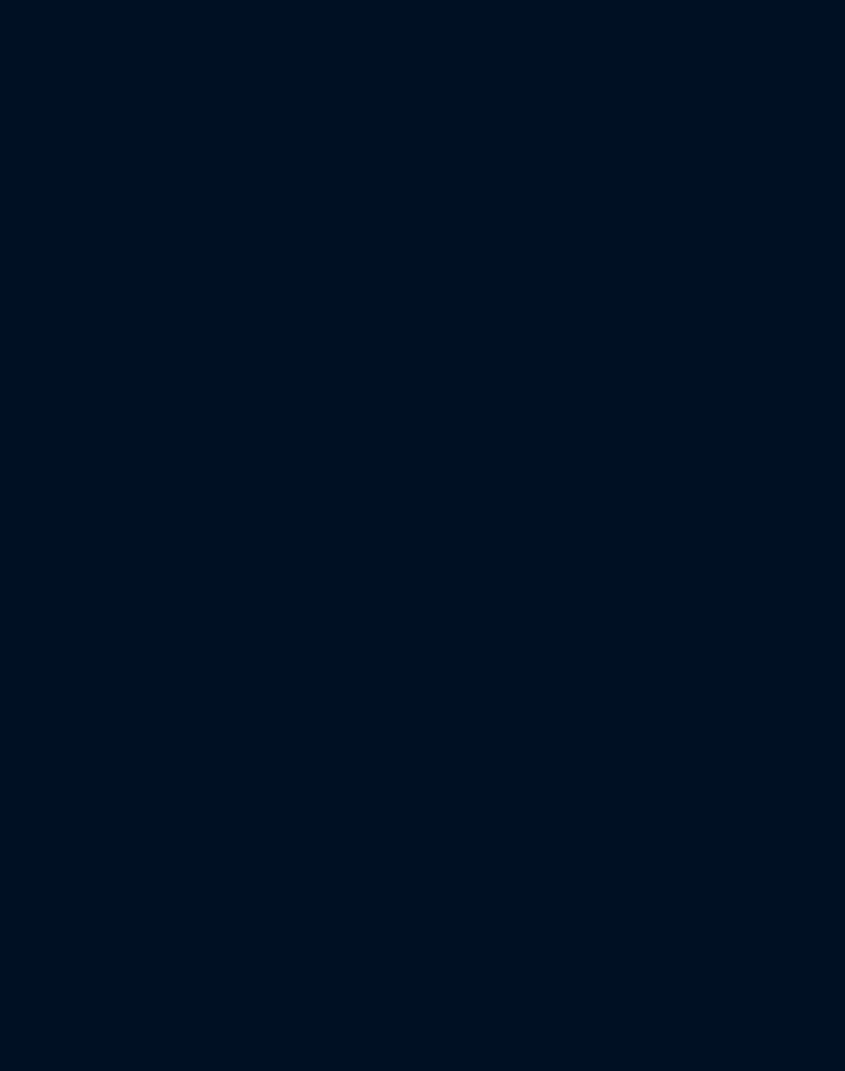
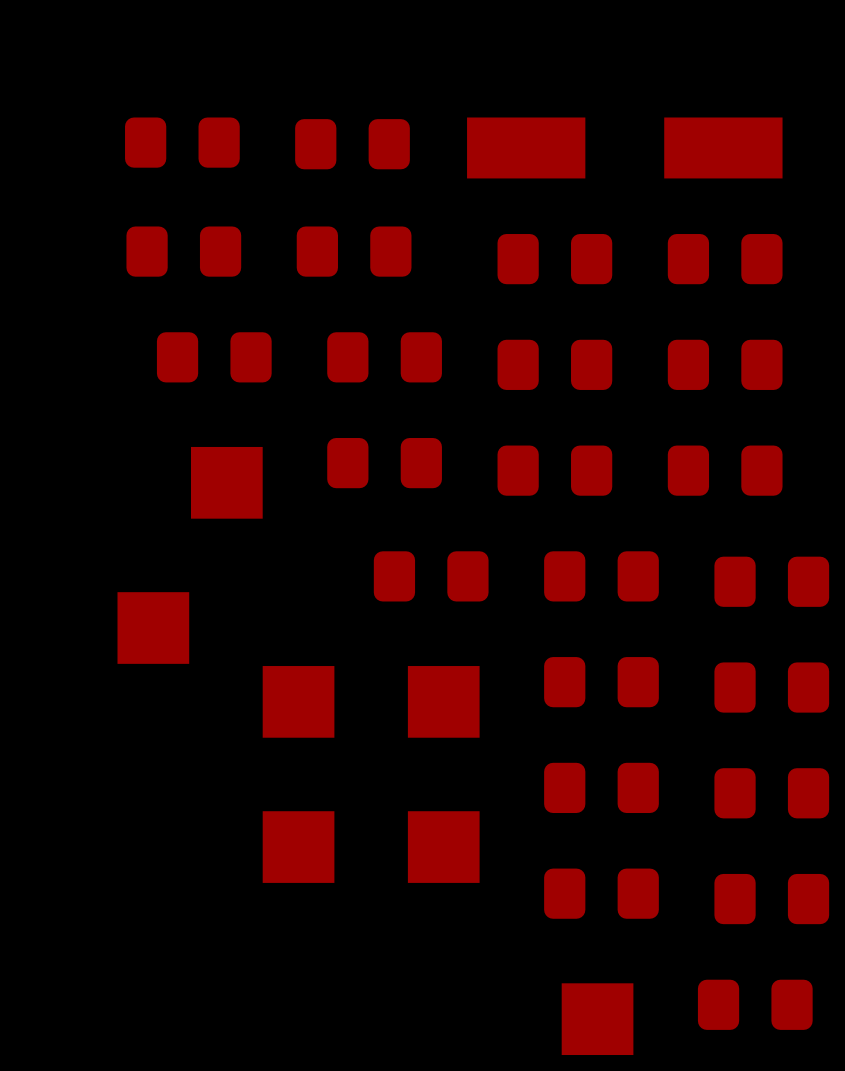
part: none -> (182, 142)
part: none -> (352, 144)
part: none -> (624, 147)
part: none -> (183, 251)
part: none -> (354, 251)
part: none -> (554, 259)
part: none -> (725, 259)
part: none -> (214, 357)
part: none -> (384, 357)
part: none -> (554, 364)
part: none -> (725, 364)
part: none -> (384, 463)
part: none -> (554, 470)
part: none -> (725, 470)
part: none -> (226, 482)
part: none -> (431, 576)
part: none -> (601, 576)
part: none -> (771, 581)
part: none -> (153, 628)
part: none -> (601, 682)
part: none -> (771, 687)
part: none -> (298, 701)
part: none -> (443, 701)
part: none -> (601, 787)
part: none -> (771, 793)
part: none -> (298, 847)
part: none -> (443, 847)
part: none -> (601, 893)
part: none -> (771, 899)
part: none -> (755, 1004)
part: none -> (597, 1019)

